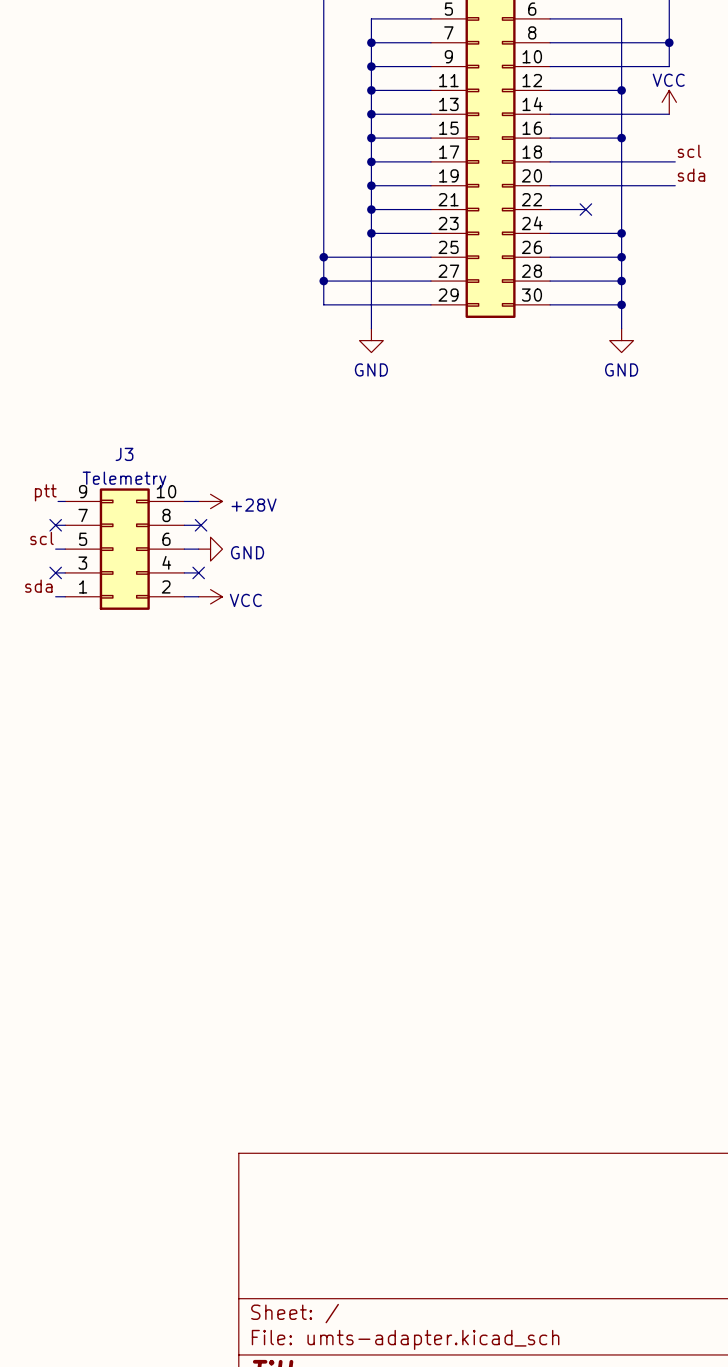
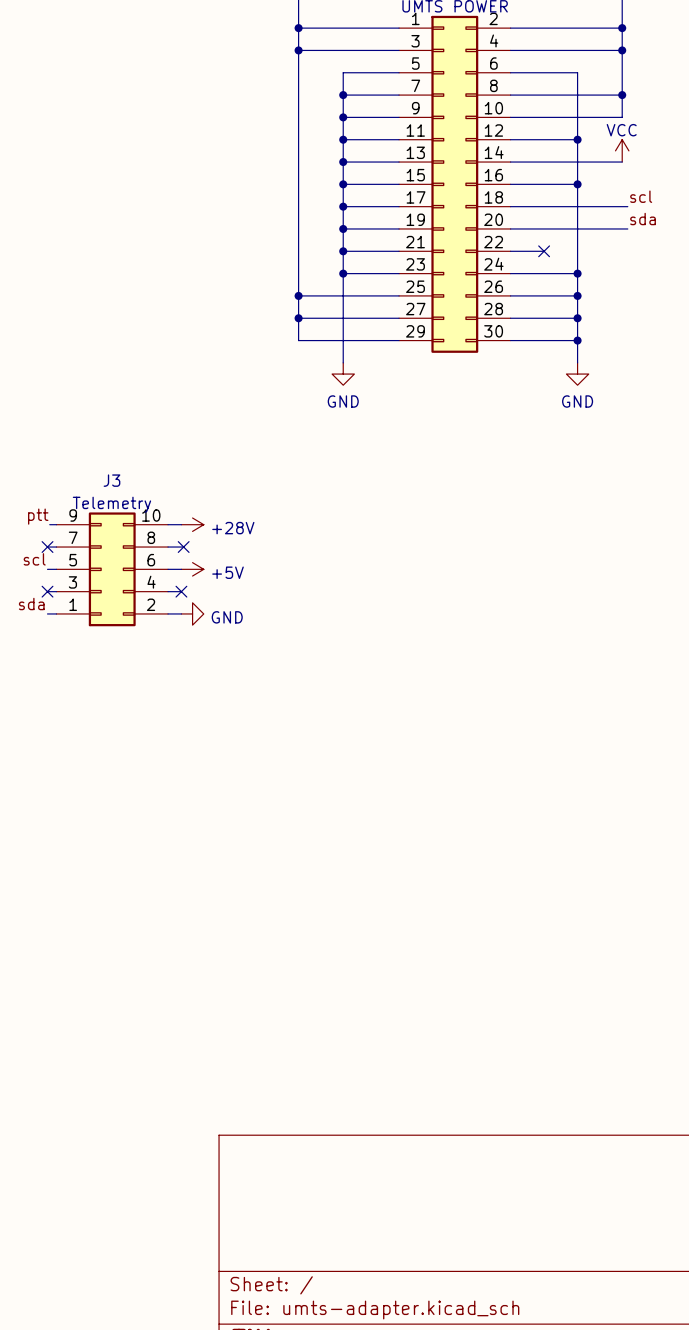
power symbol: GND (210, 549) -> +5V (192, 569)
power symbol: VCC (210, 596) -> GND (192, 613)

